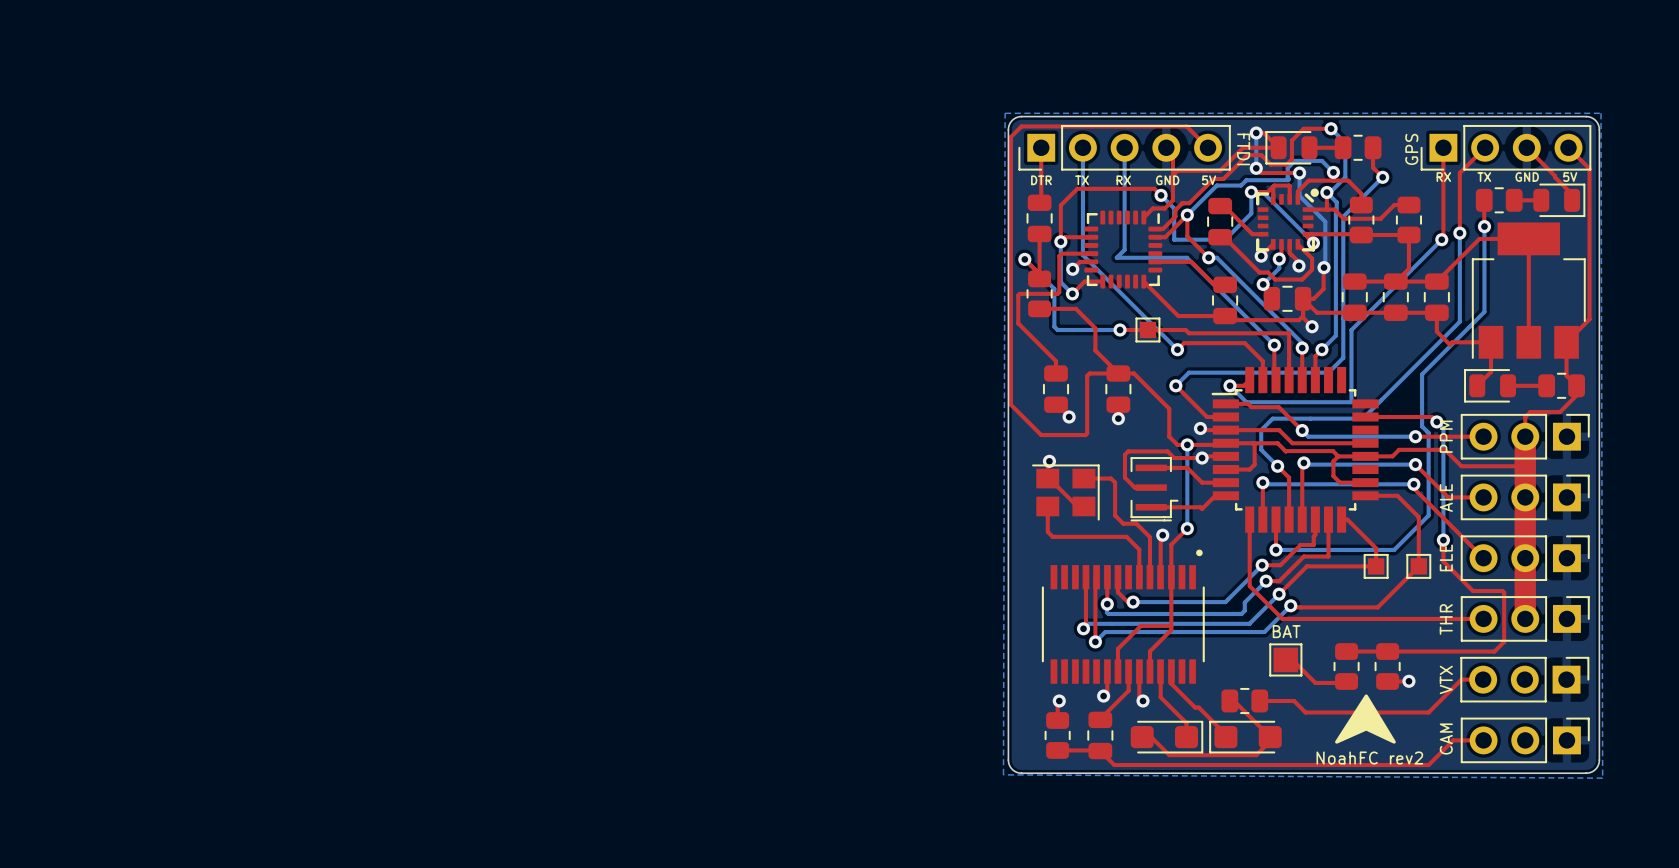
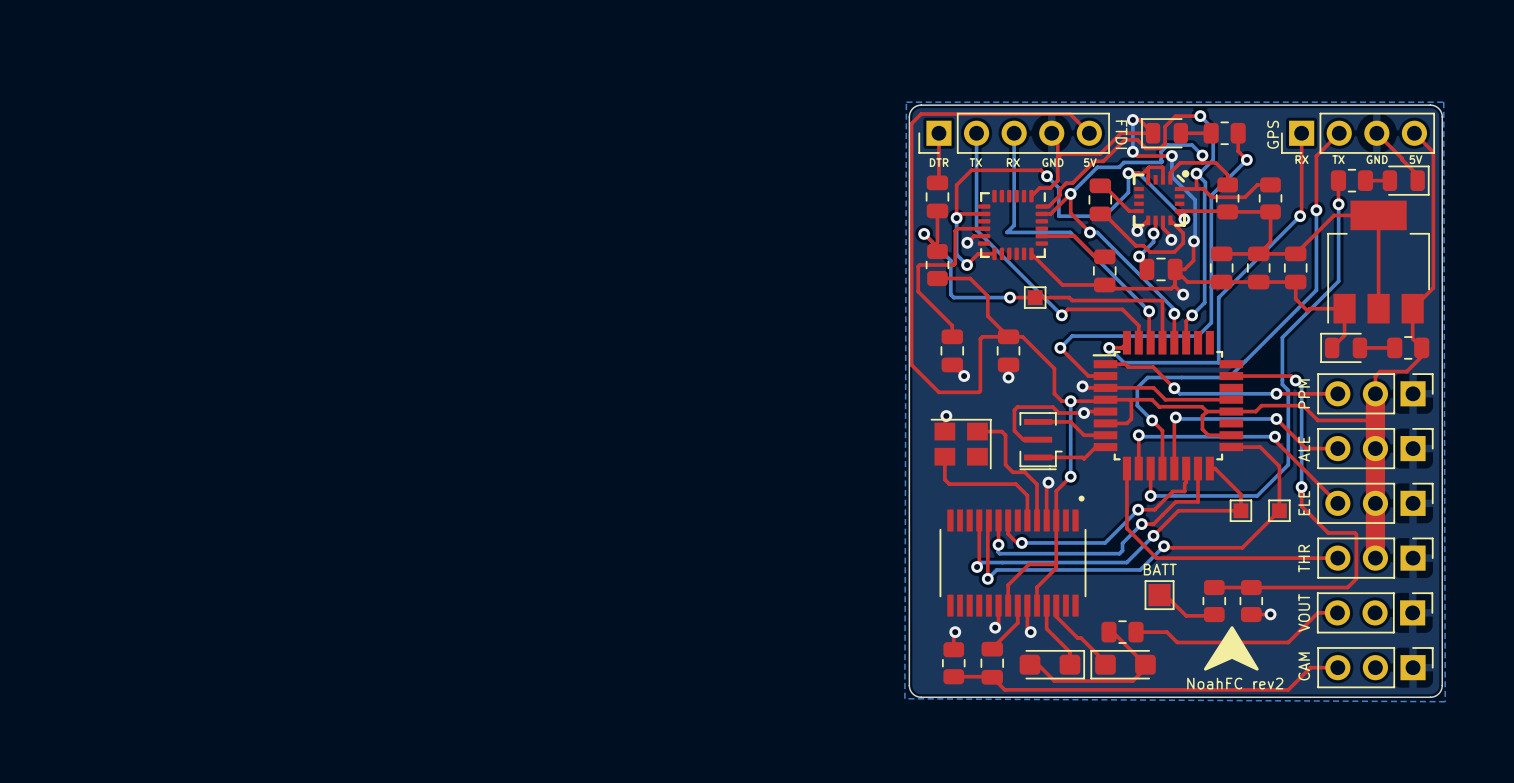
top track: (1047, 478) (1077, 506) (1083, 506) -> none
text: BAT (1286, 631) -> BATT (1160, 569)
text: VTX (1446, 679) -> VOUT (1304, 612)

